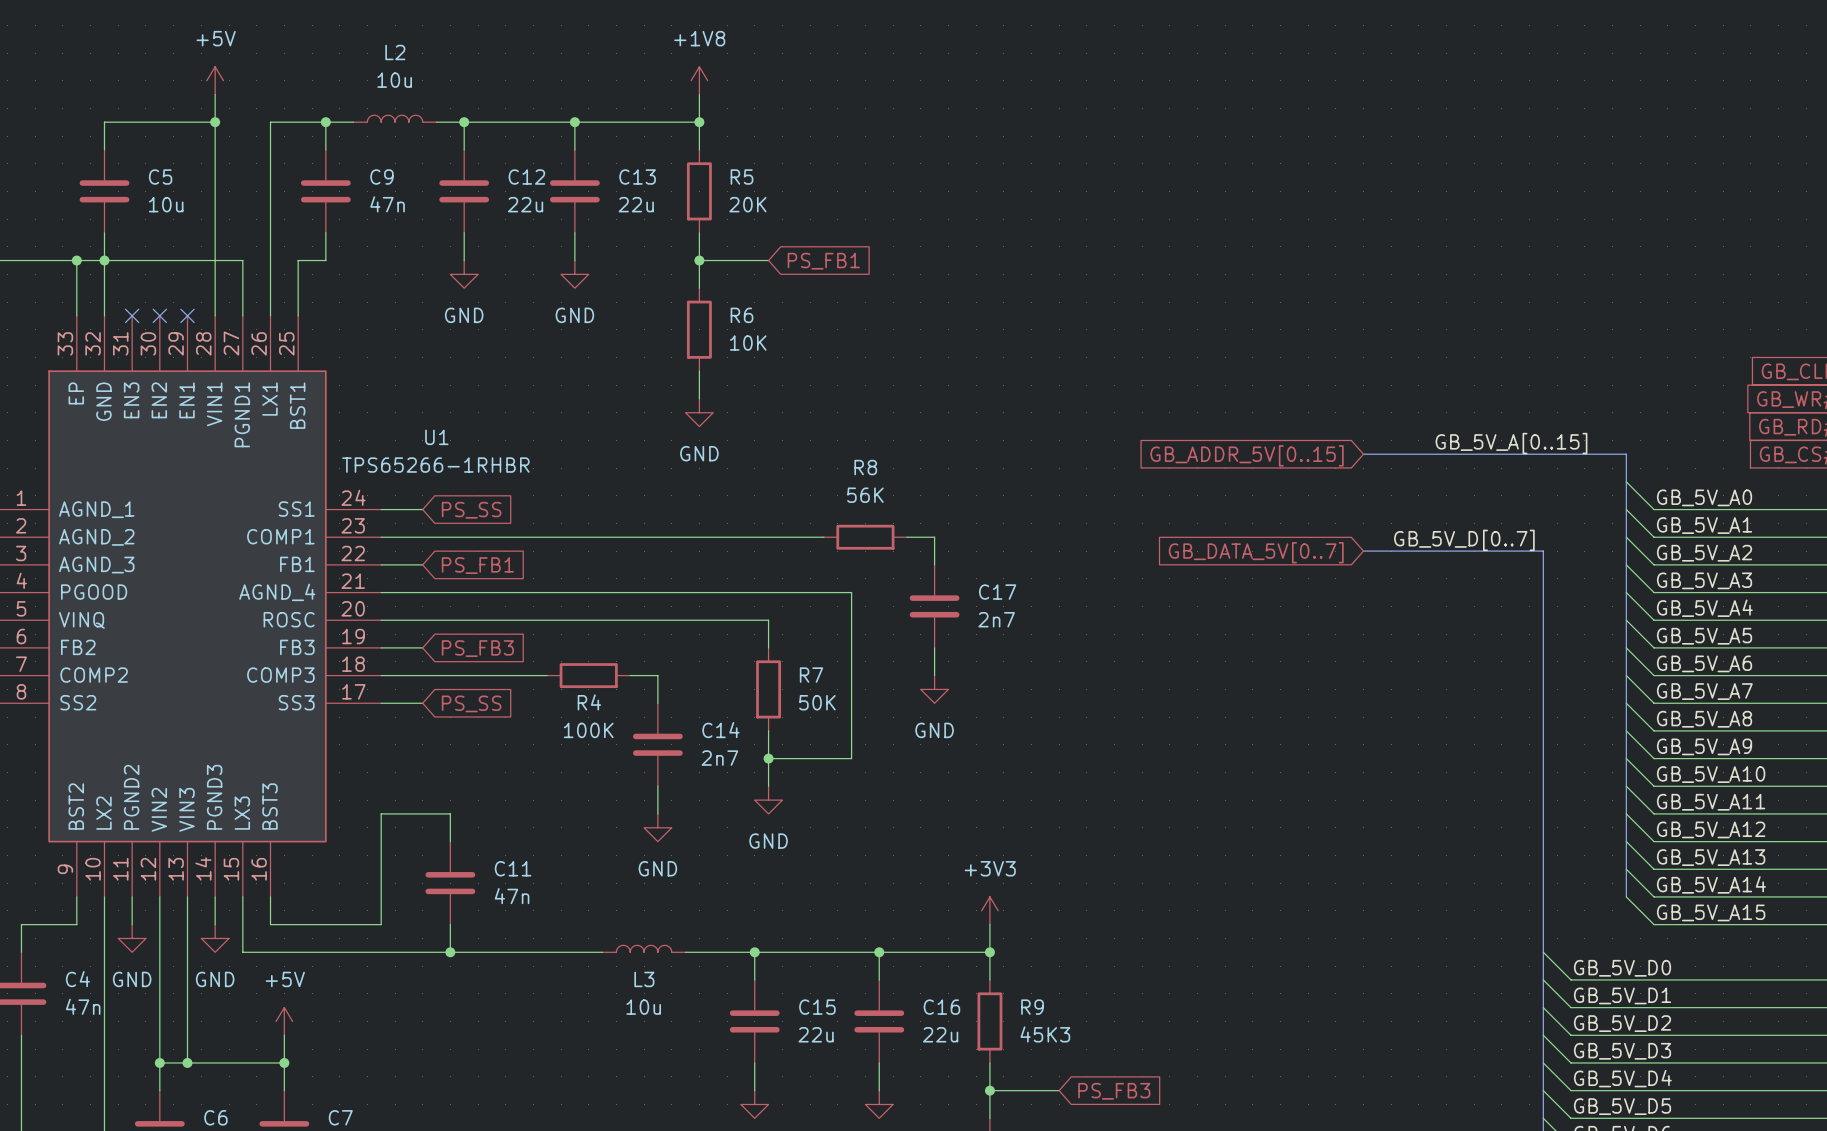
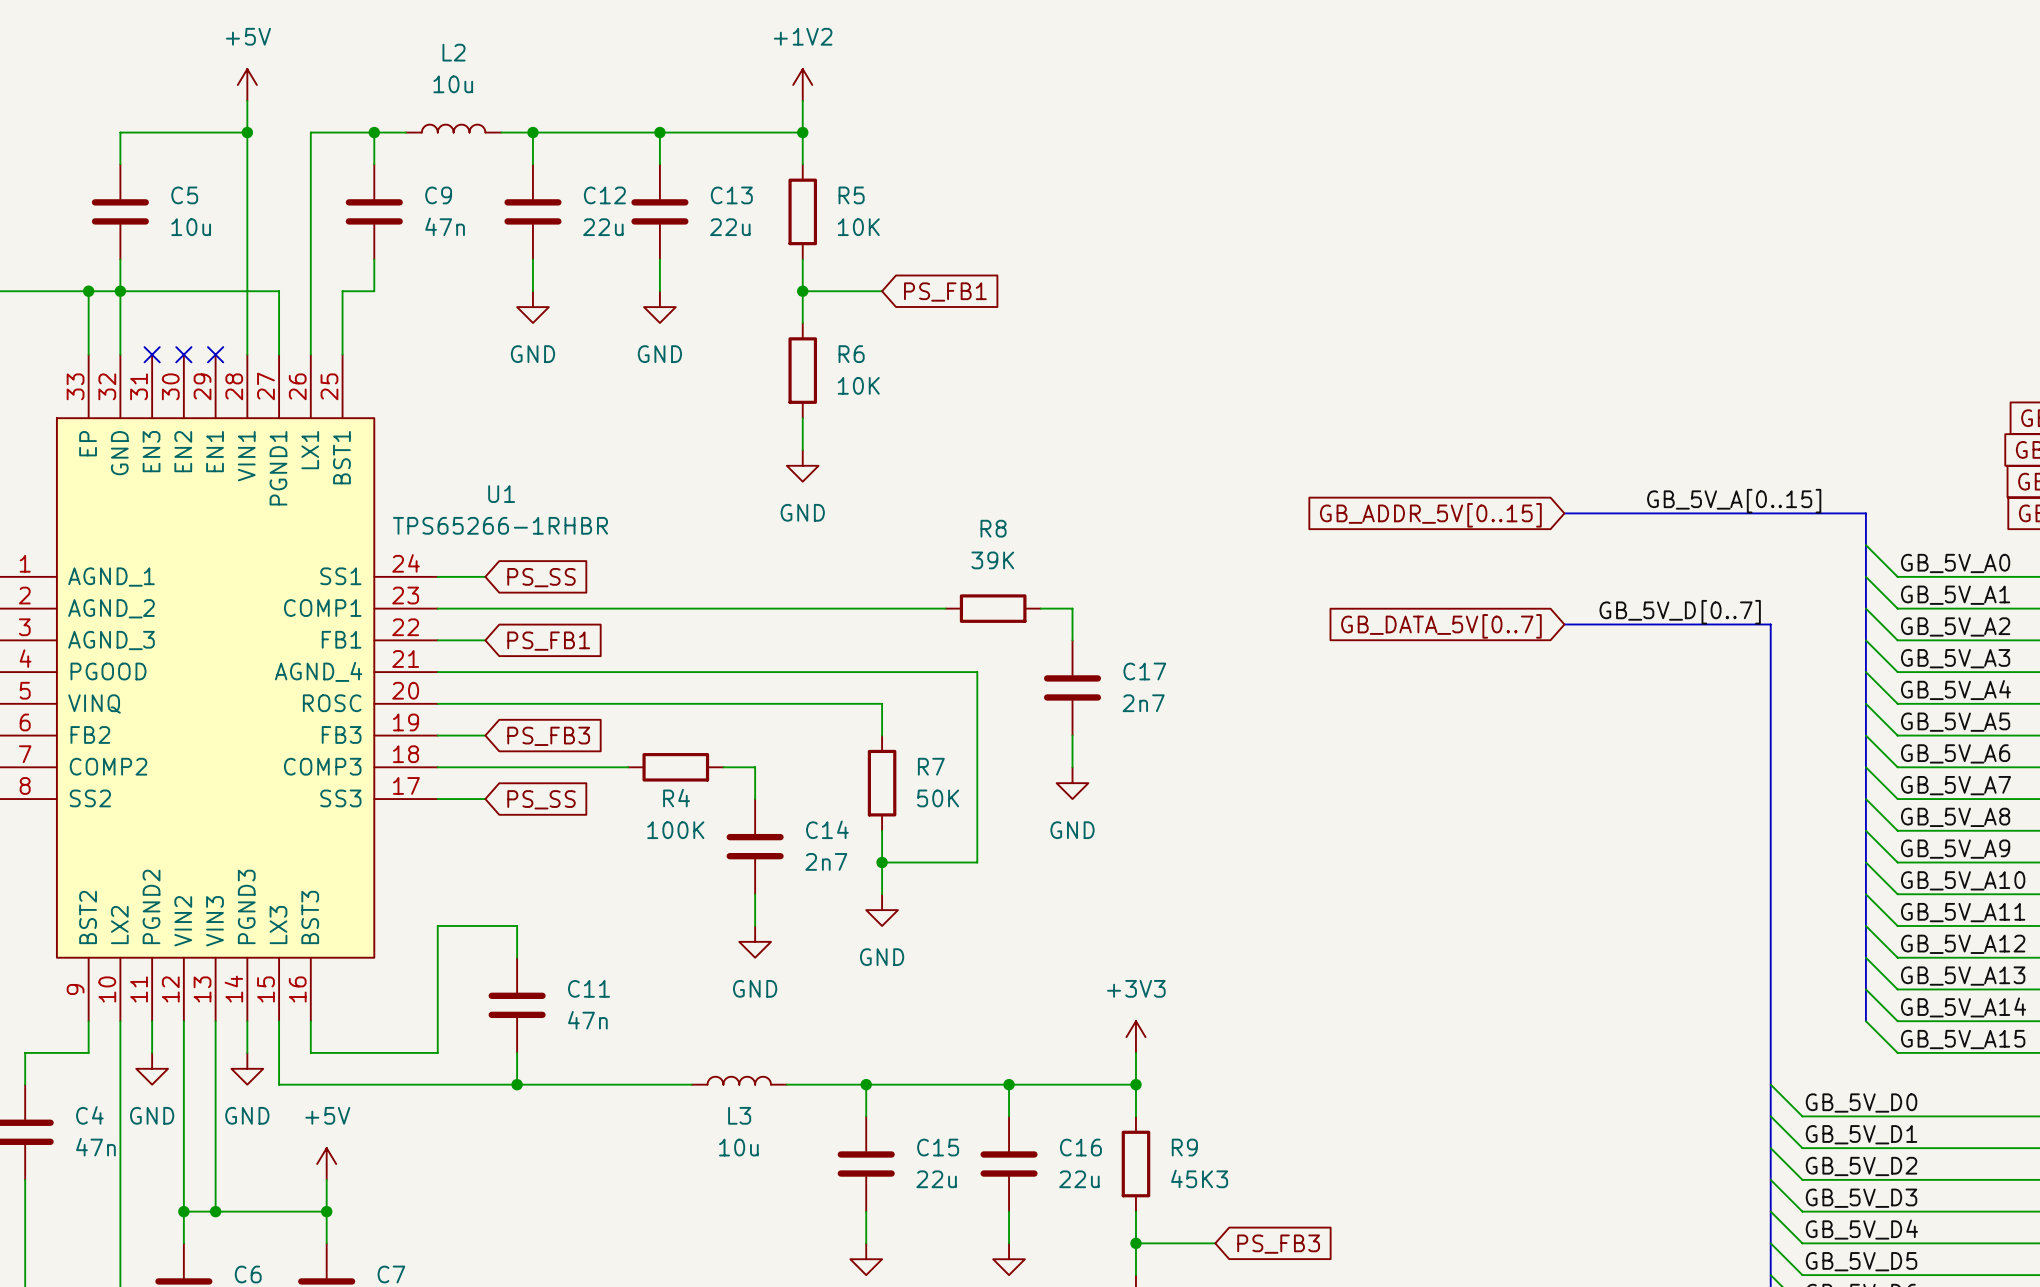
power symbol: +1V8 (699, 80) -> +1V2 (802, 84)
R5 value: 20K (747, 204) -> 10K (858, 227)
R8 value: 56K (865, 495) -> 39K (992, 560)

